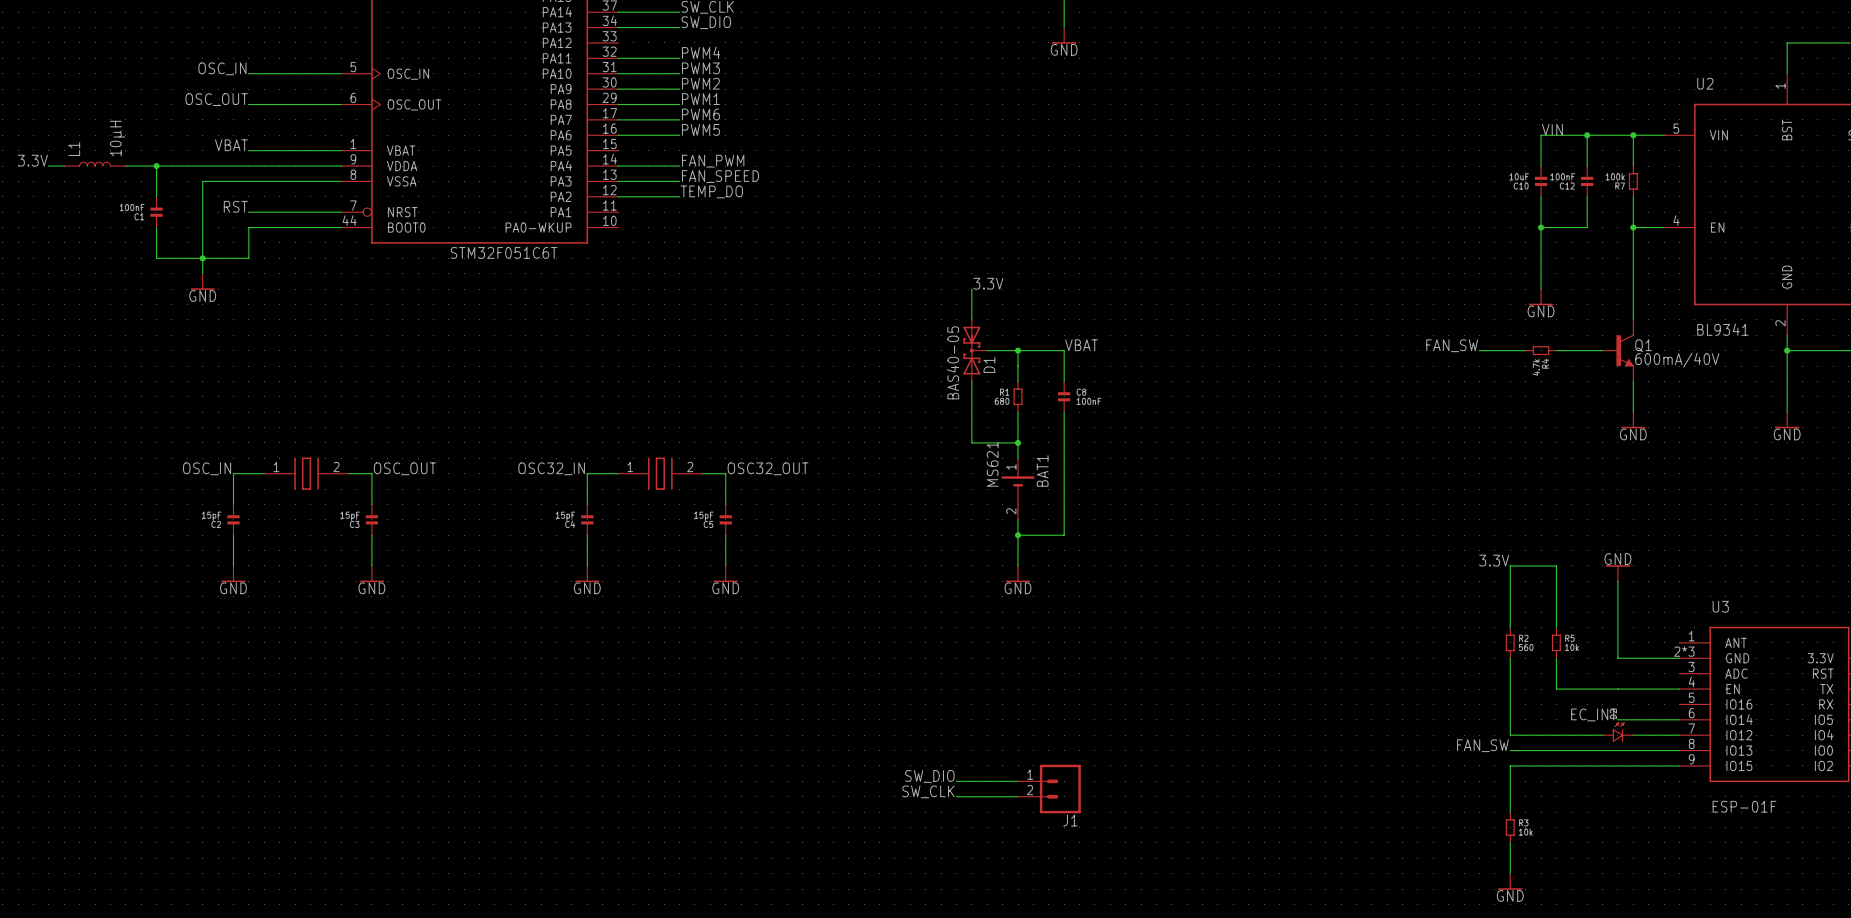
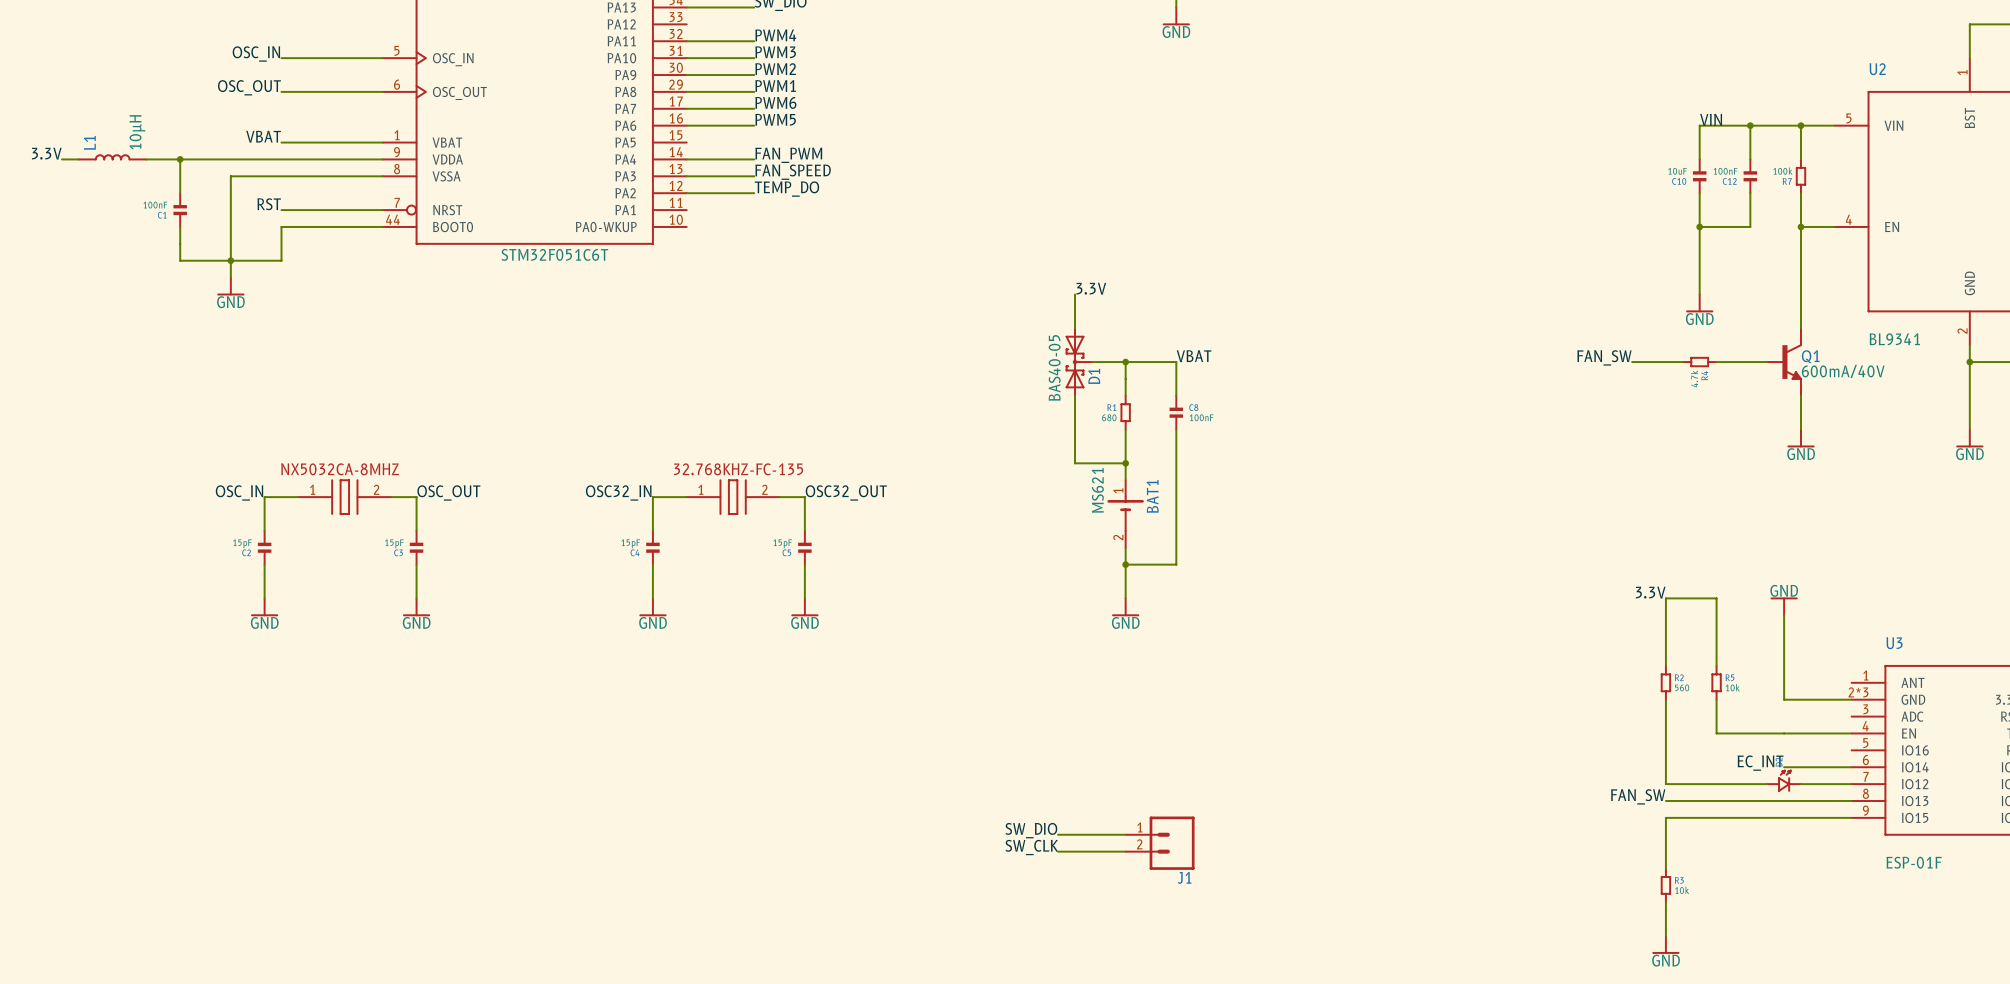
part text: none -> NX5032CA-8MHZ (340, 469)
part text: none -> 32.768KHZ-FC-135 (738, 469)

